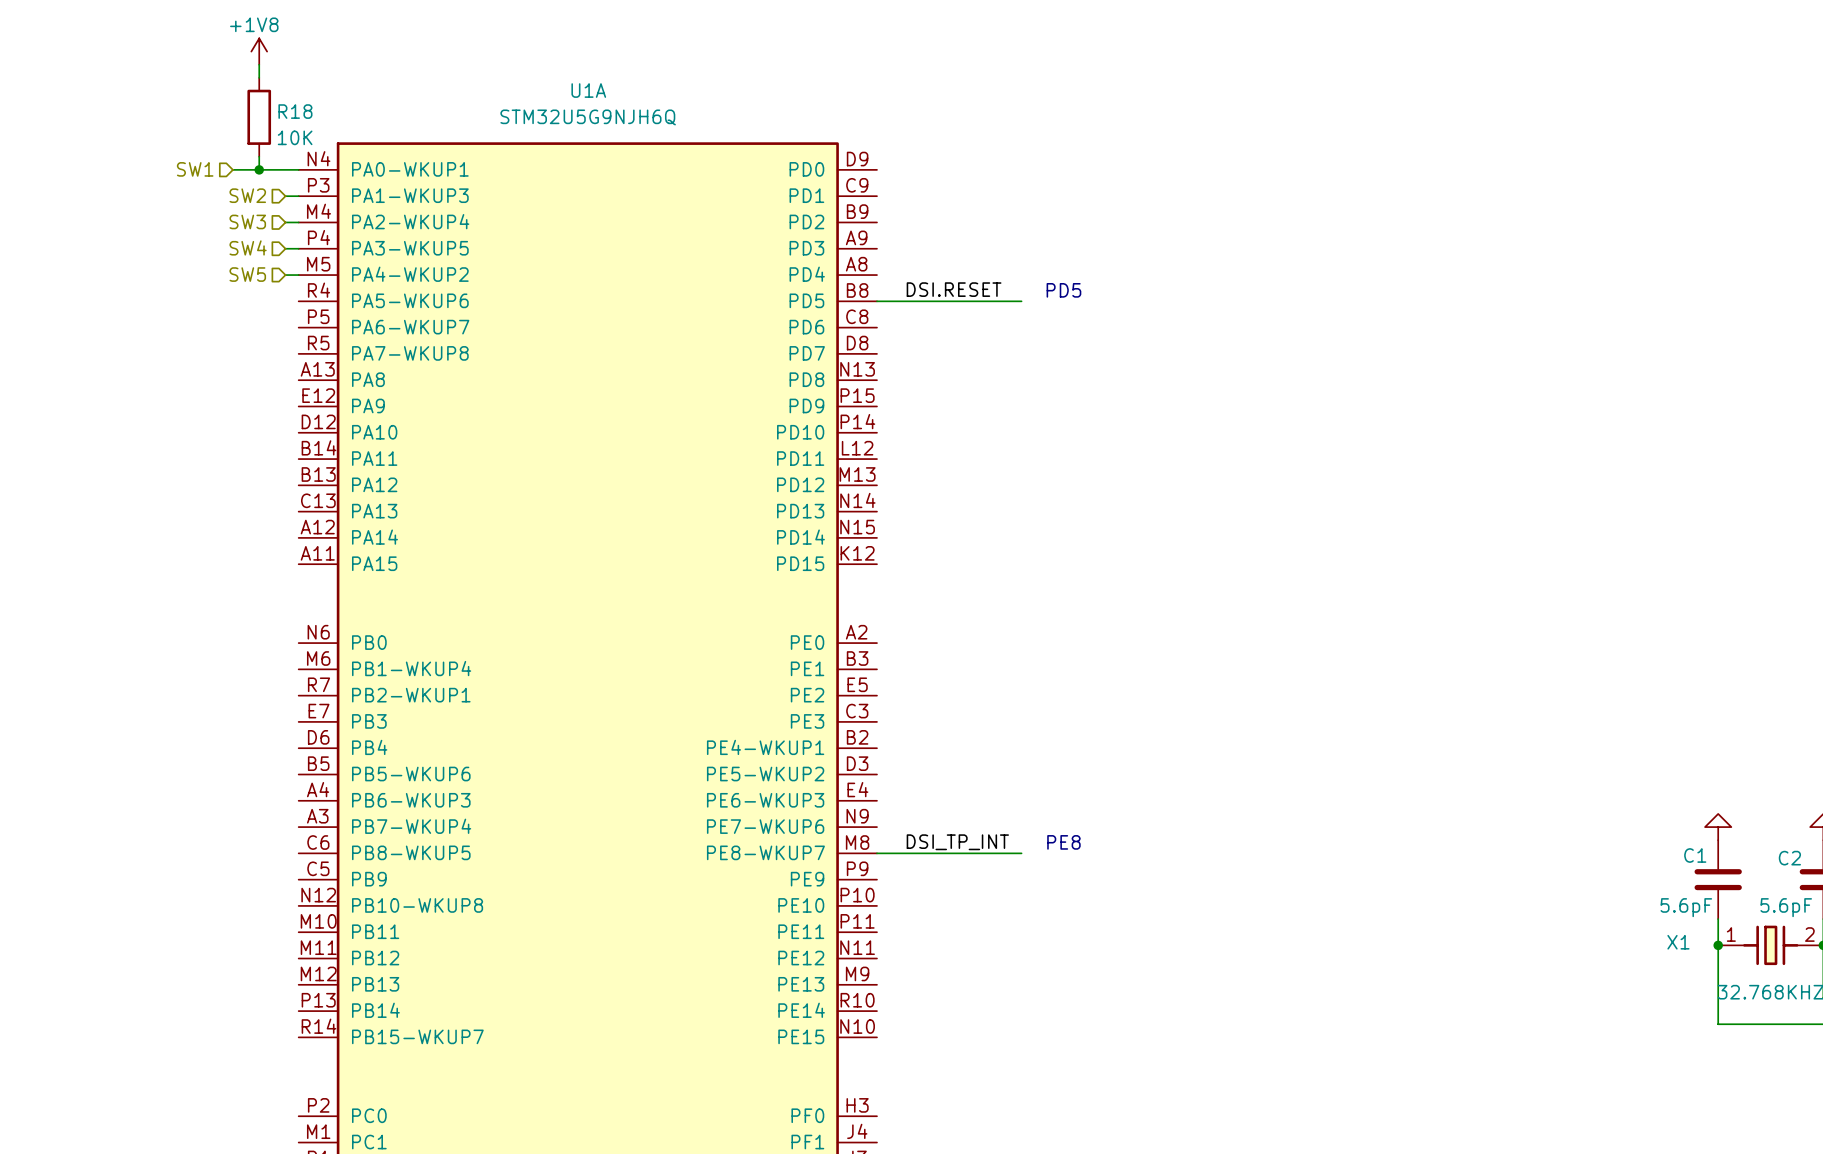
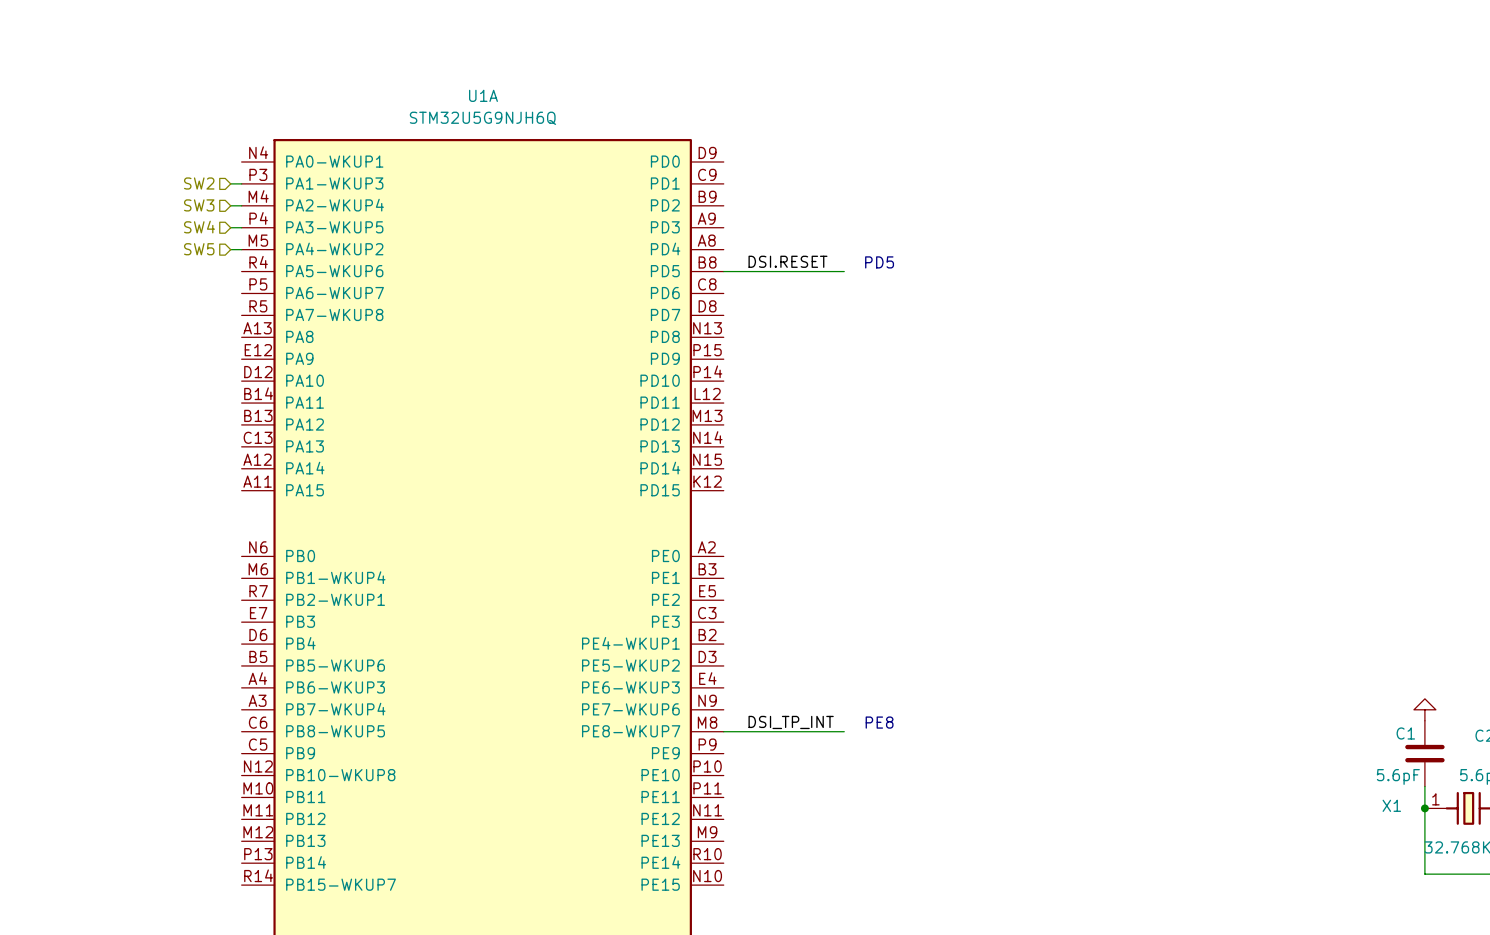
power symbol: +1V8 (259, 51) -> none
wire: (259, 64) (259, 77) -> none
R18: 10K (259, 117) -> none
wire: (259, 156) (259, 169) -> none
hierarchical label: SW1 (195, 169) -> none
wire: (232, 169) (298, 169) -> none
junction: (259, 169) -> none

